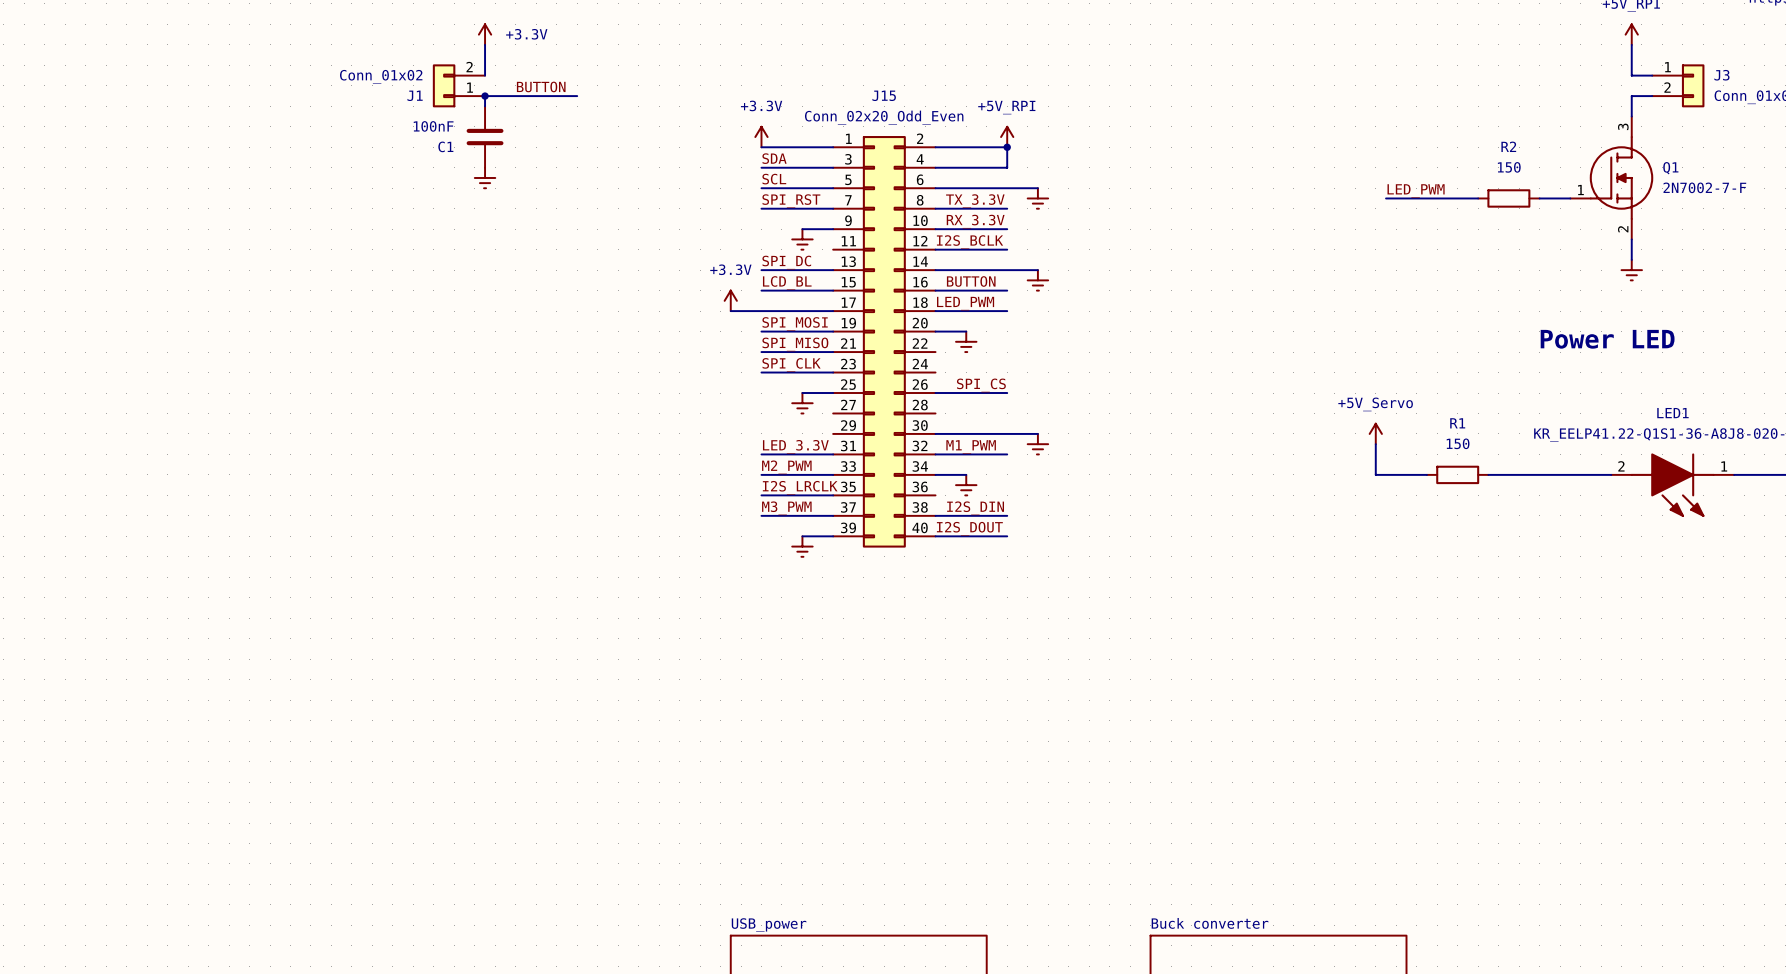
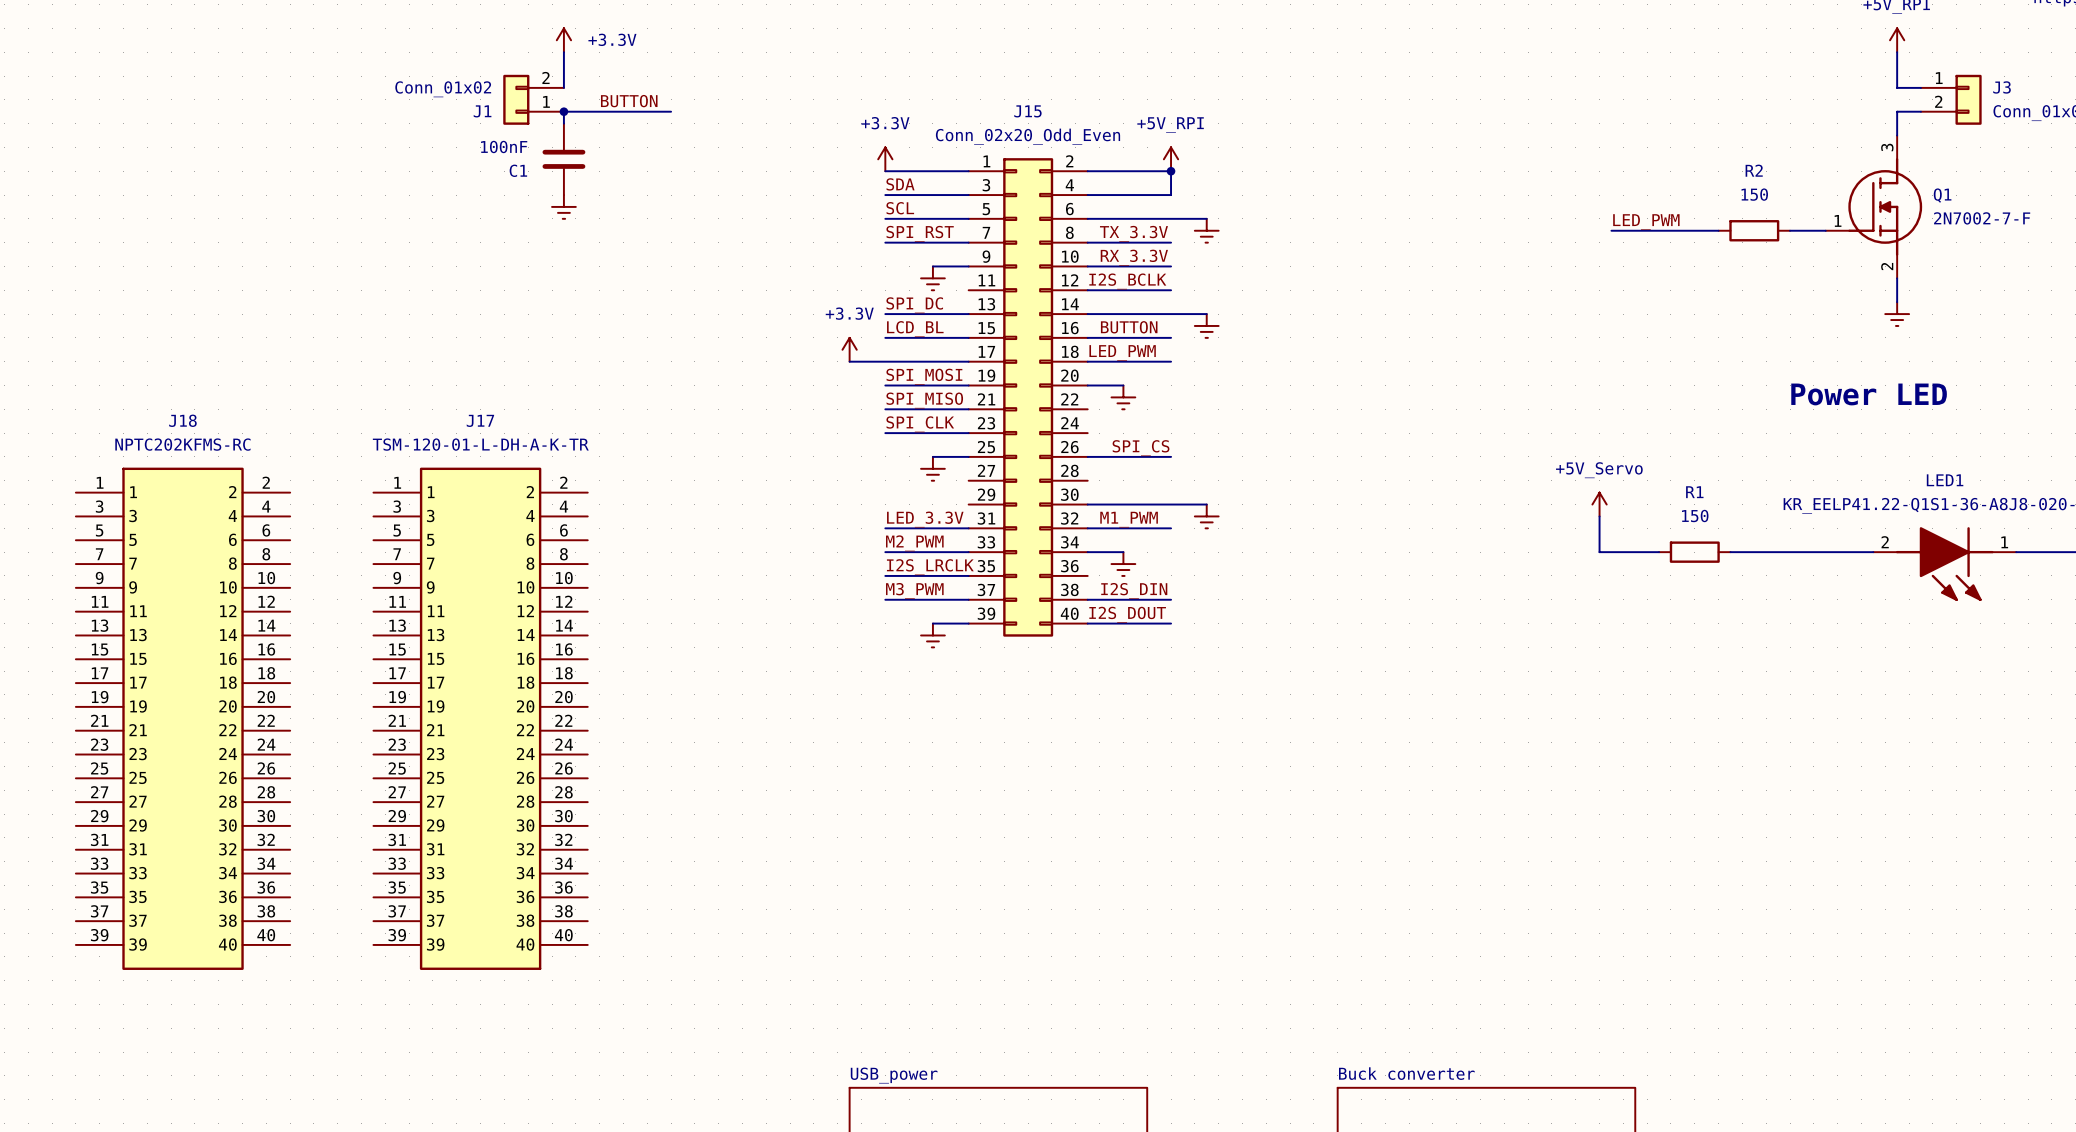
J18: none -> NPTC202KFMS-RC (183, 718)
J17: none -> TSM-120-01-L-DH-A-K-TR (480, 718)

